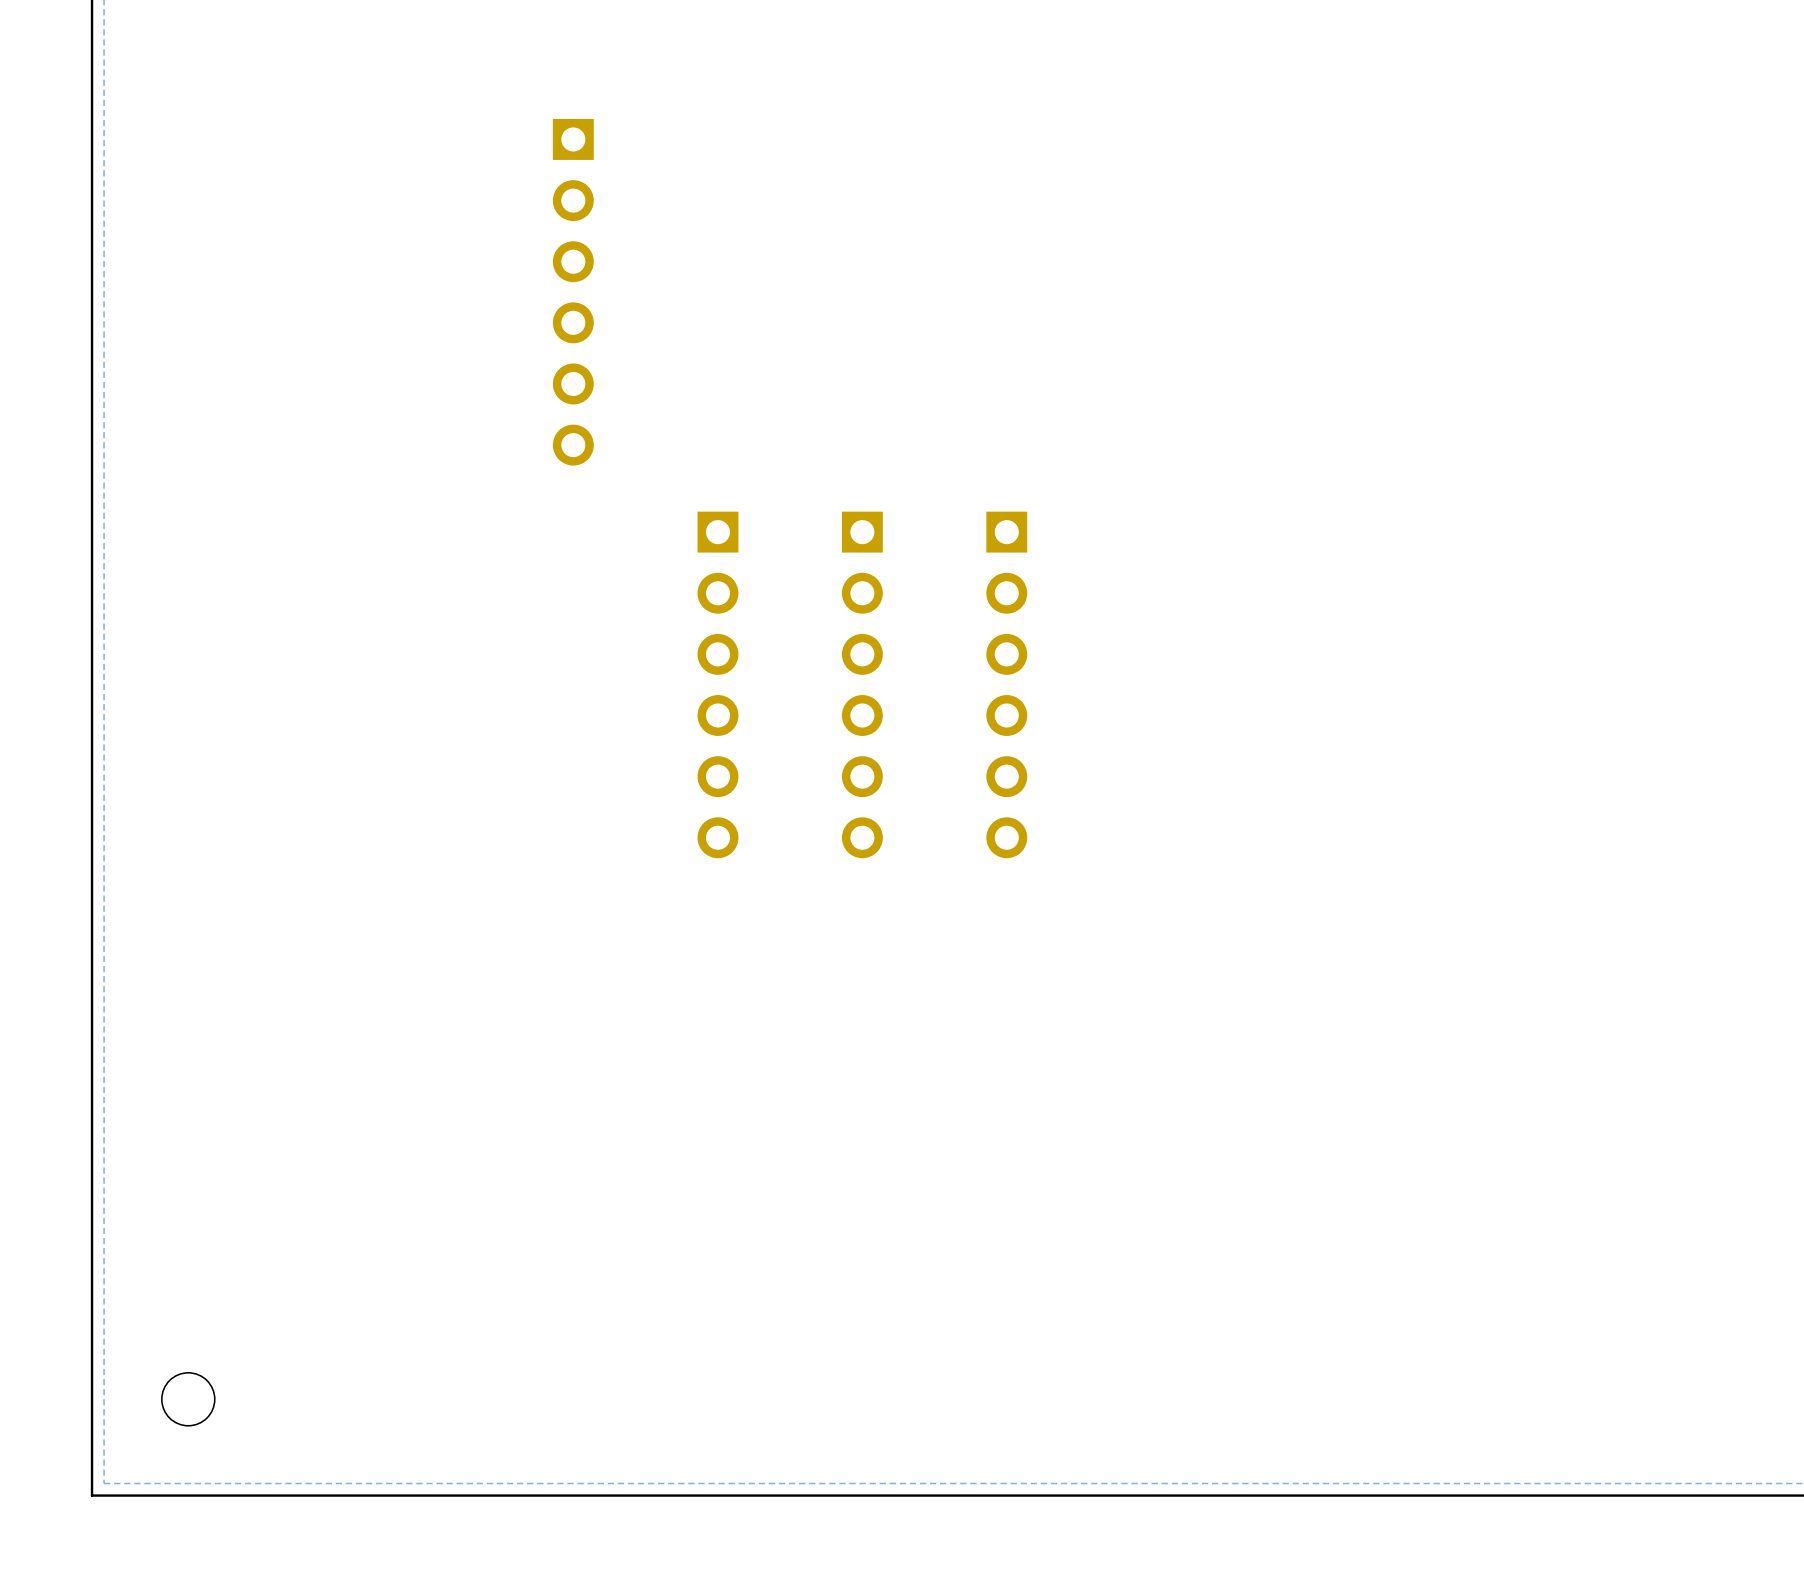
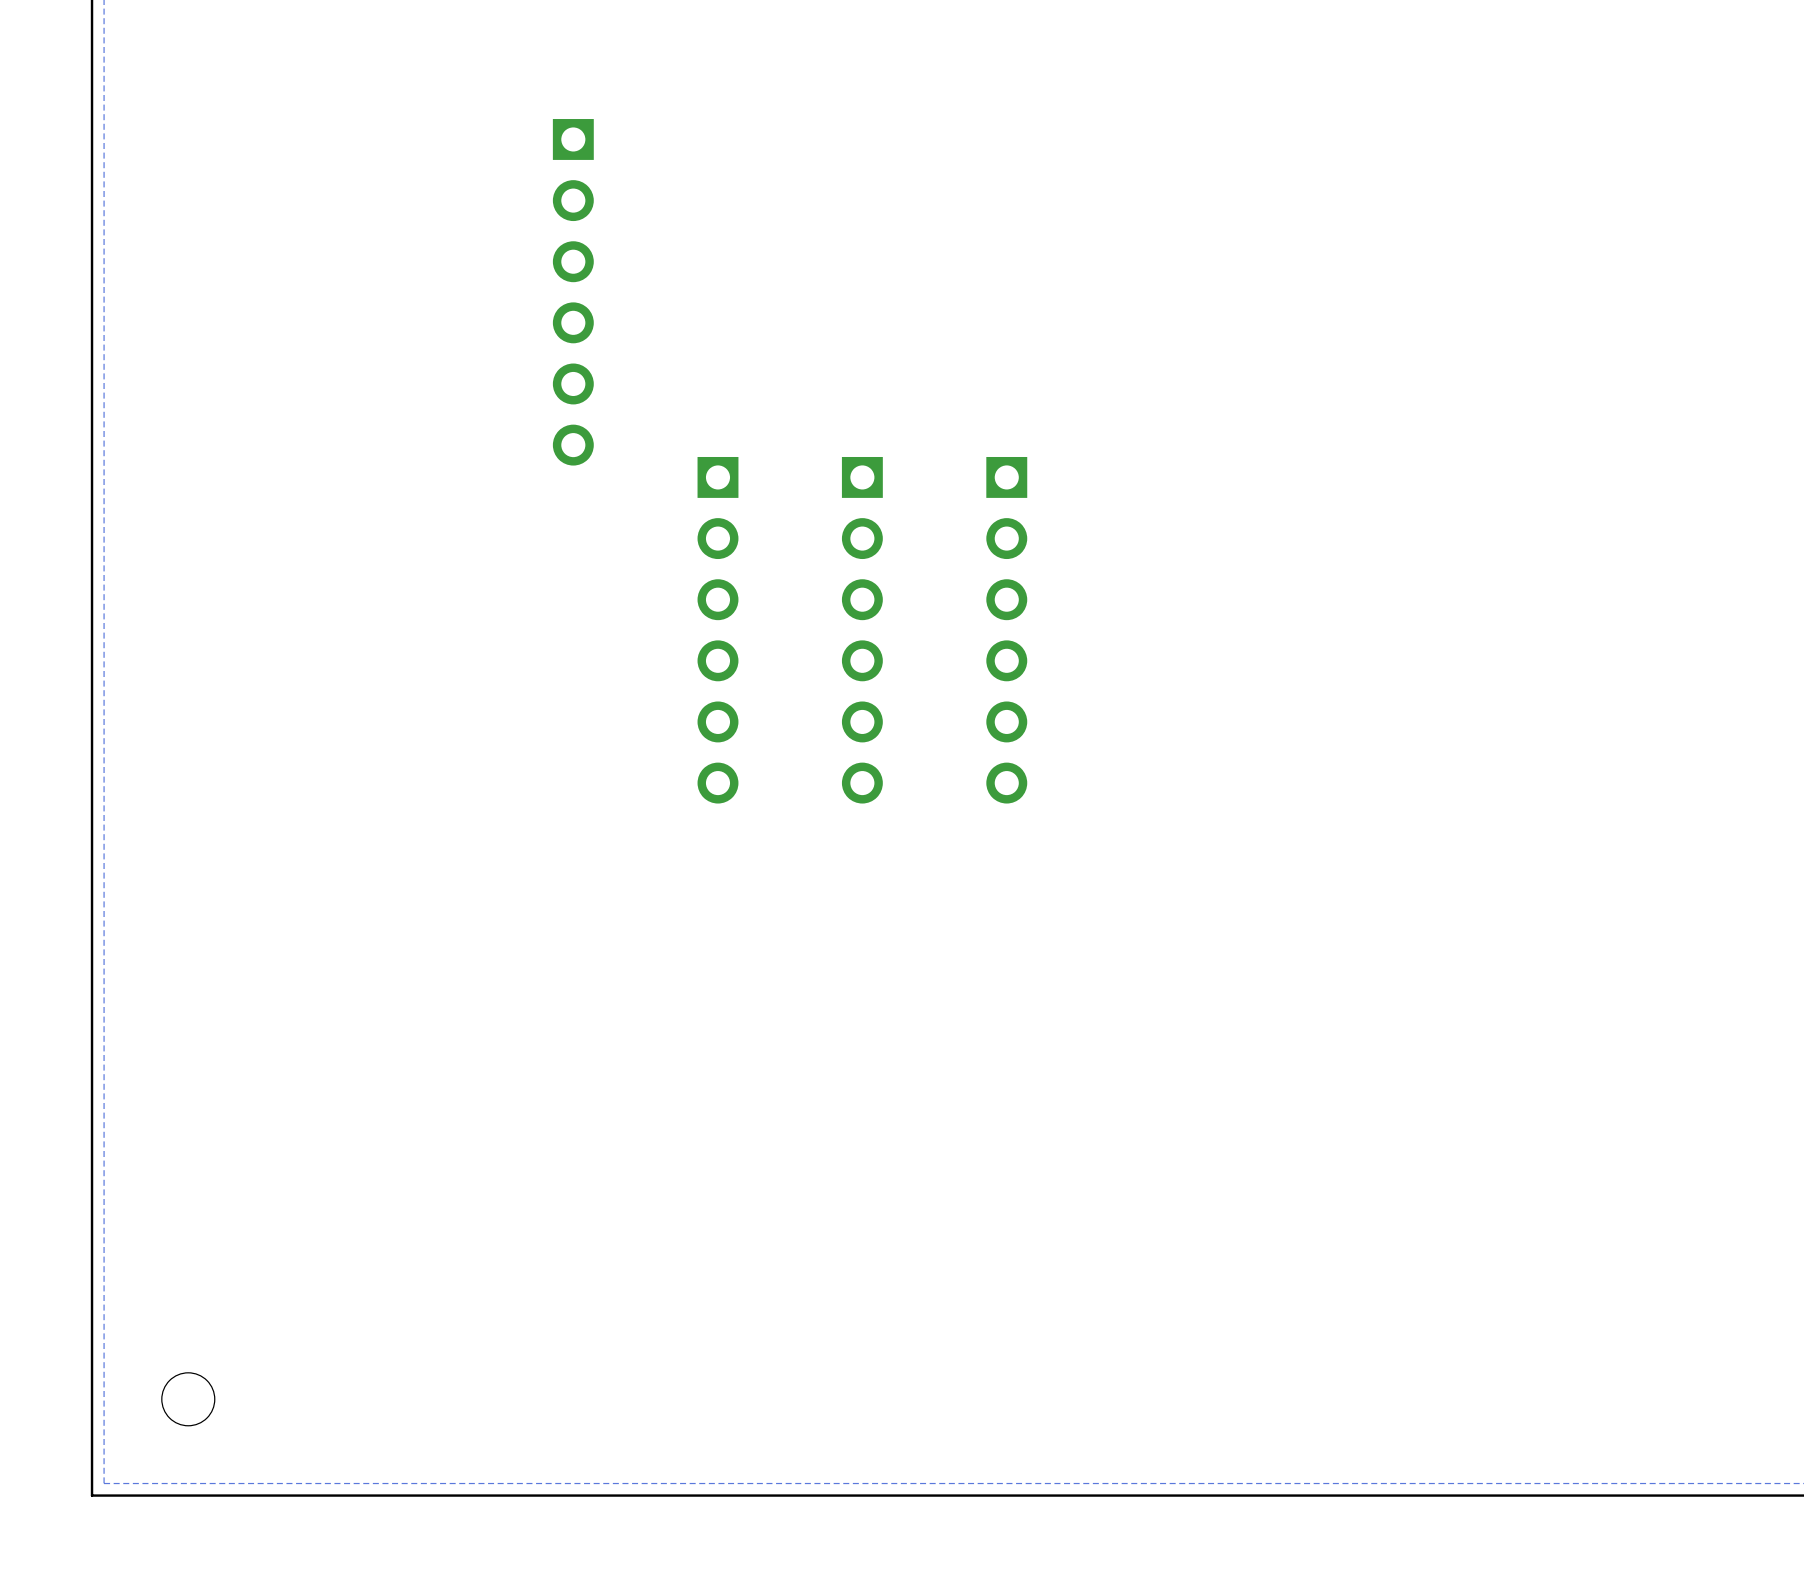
part position: (717, 684) -> (717, 630)
part position: (862, 684) -> (862, 630)
part position: (1006, 684) -> (1006, 630)

